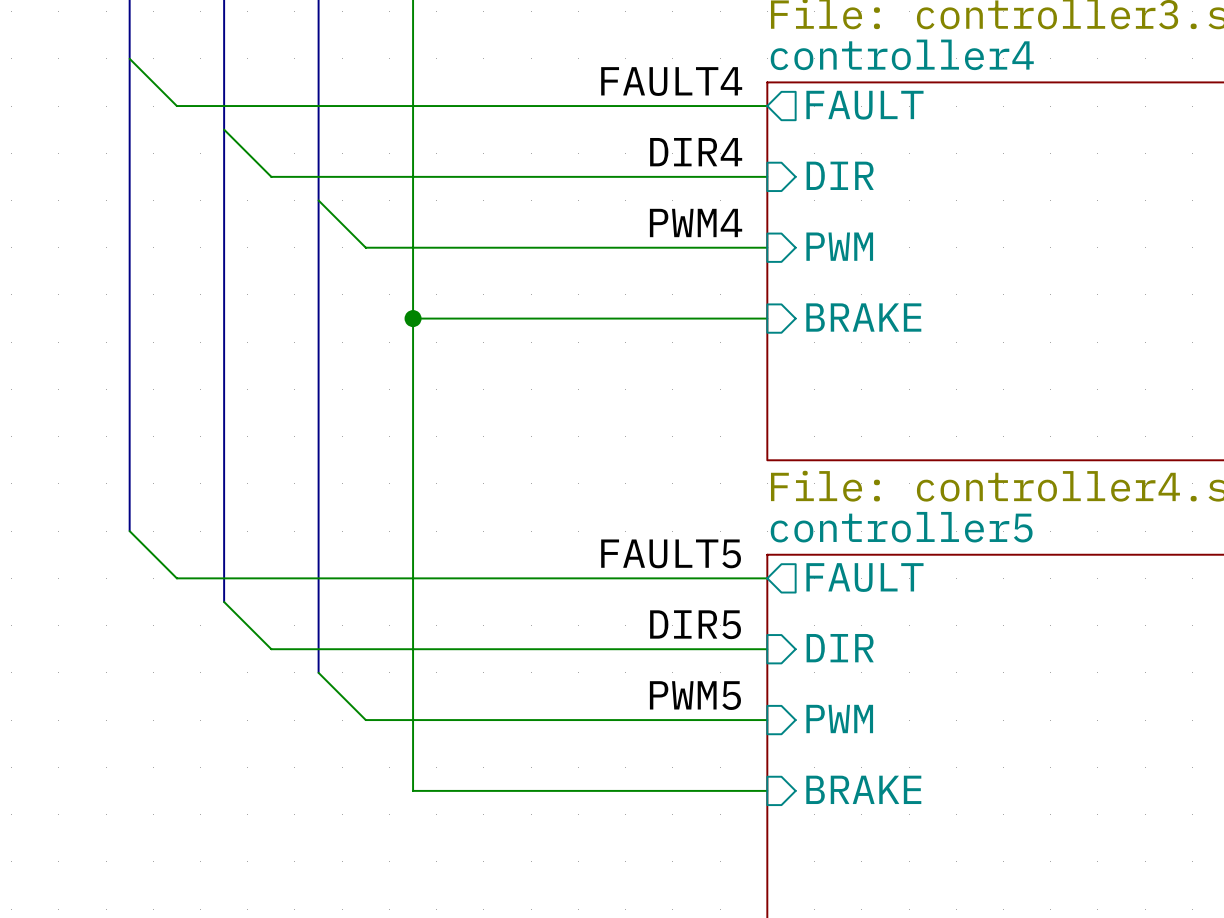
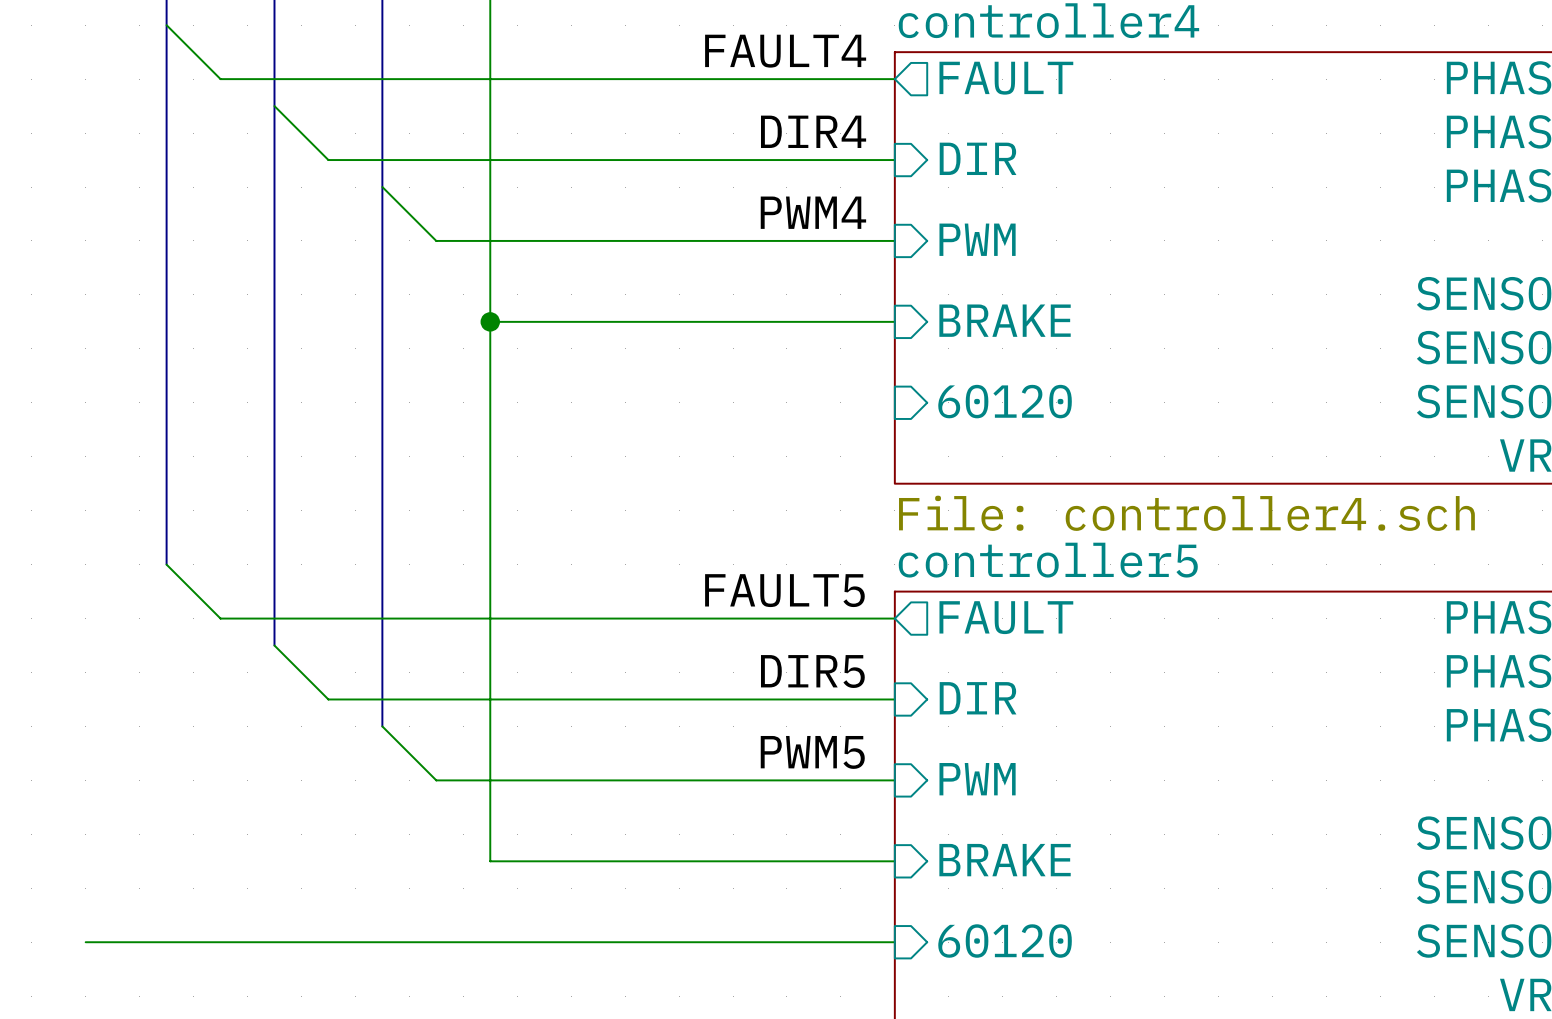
sheet pin: none -> 60120 (1005, 401)
sheet pin: none -> 60120 (1005, 941)
wire: none -> (85, 942) (894, 942)

